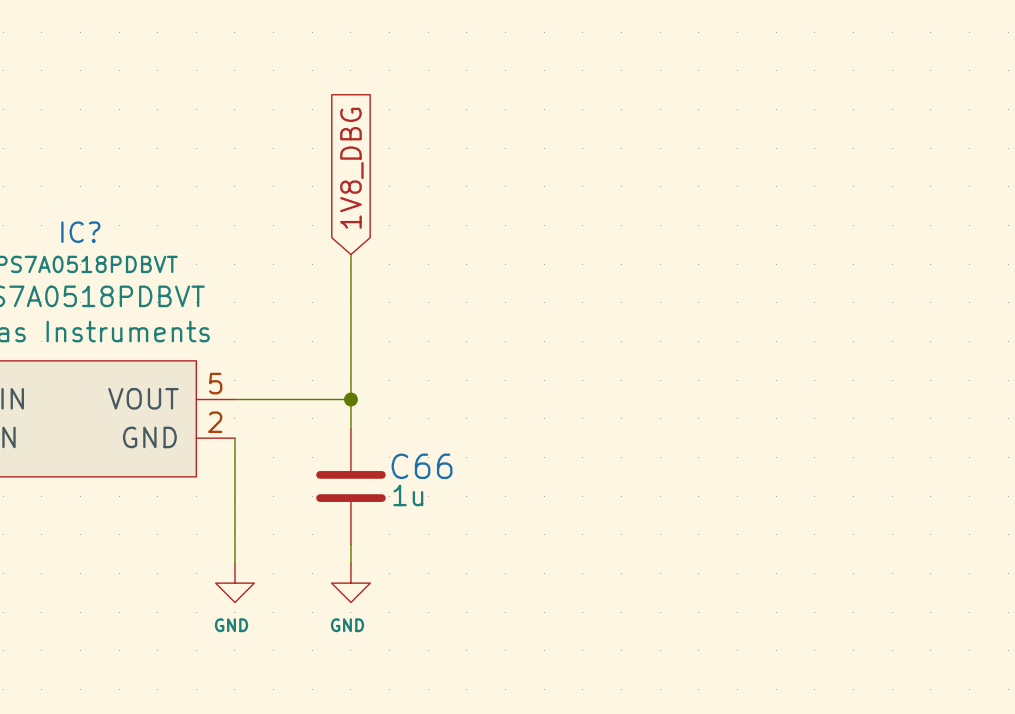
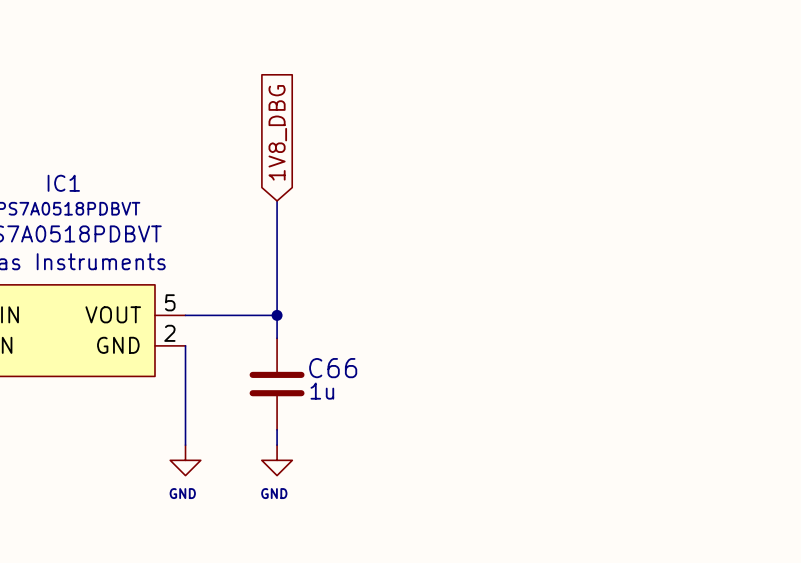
IC? name: IC? (80, 232) -> IC1 (63, 183)

